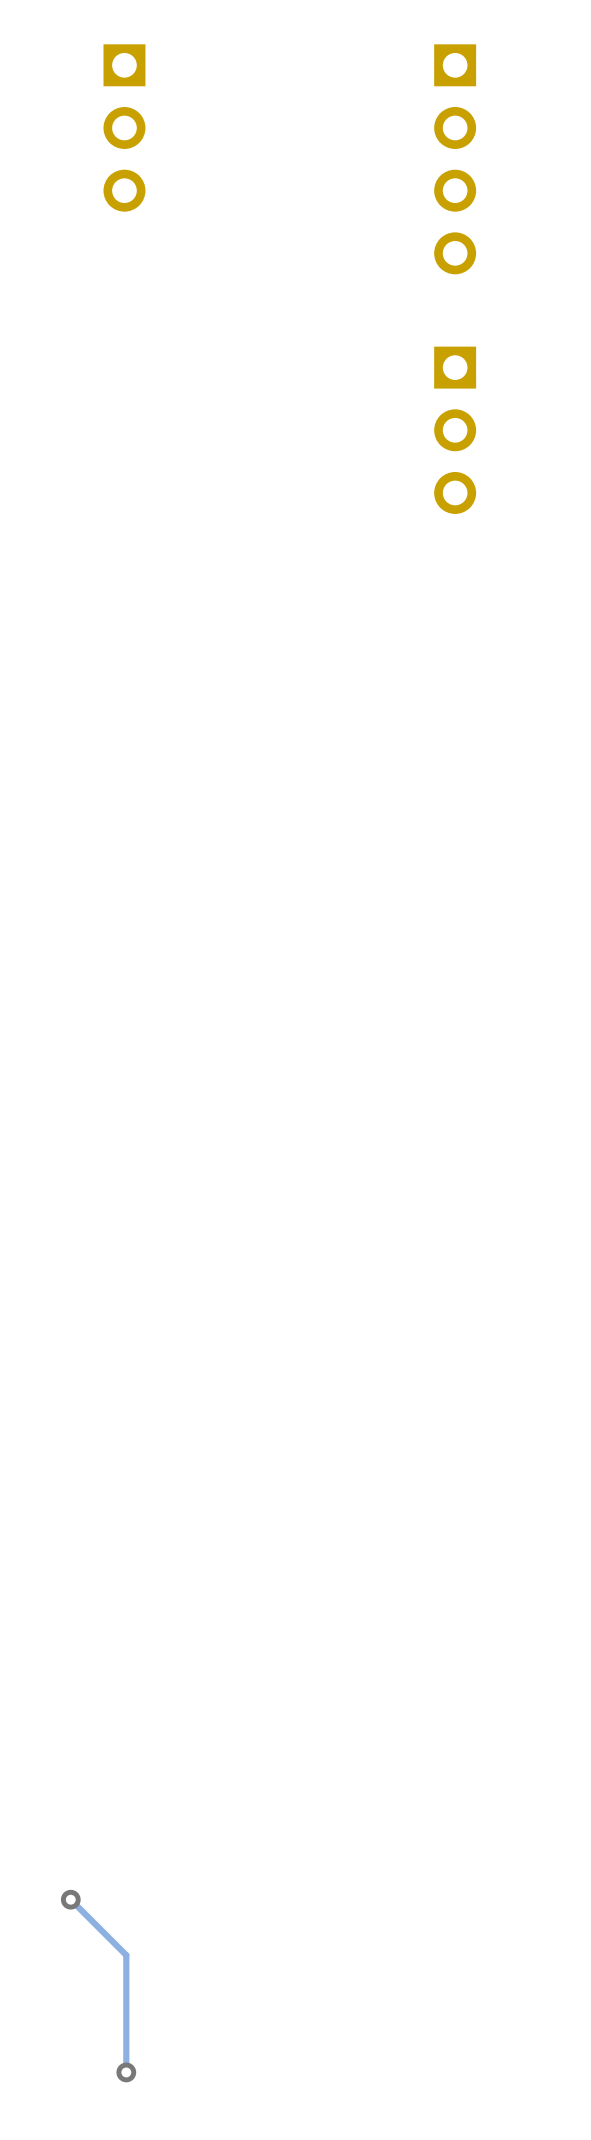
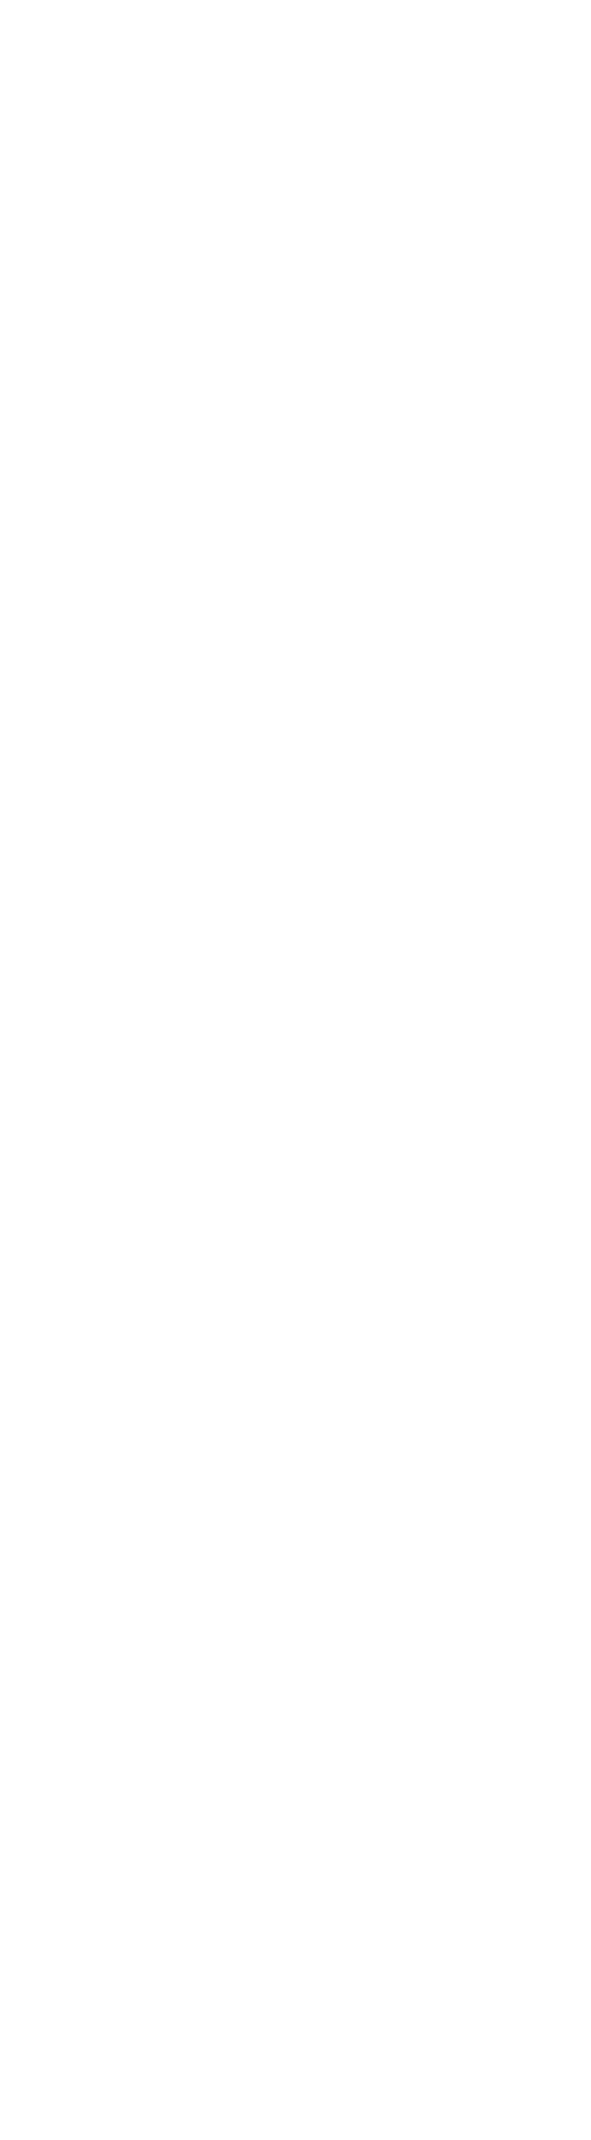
part: (124, 127) -> none
part: (455, 159) -> none
part: (455, 430) -> none
track: (70, 1899) (126, 1955) (126, 2072) -> none
via: (70, 1899) -> none
via: (126, 2072) -> none

